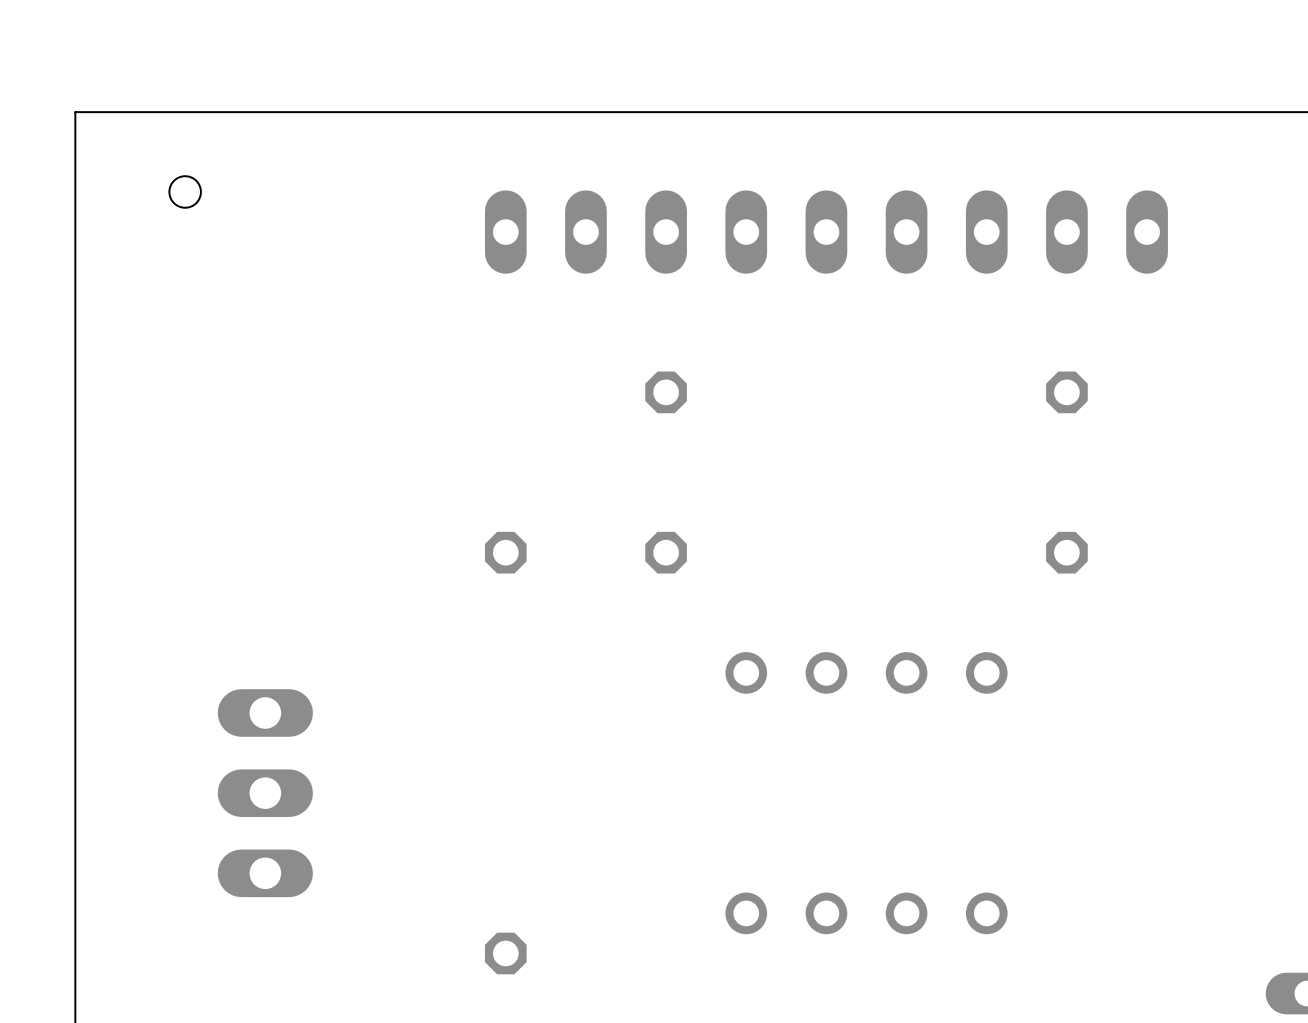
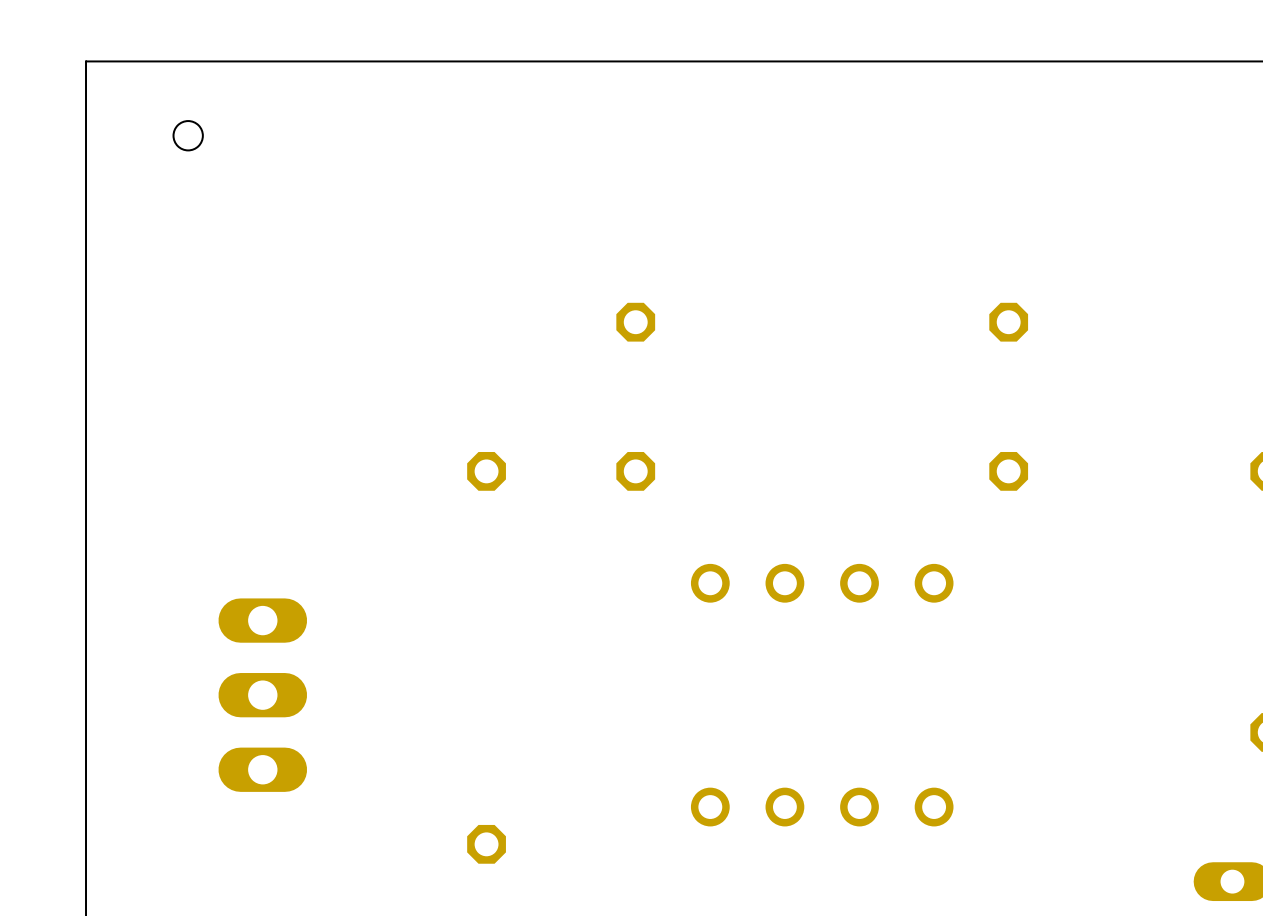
part: (826, 232) -> none

